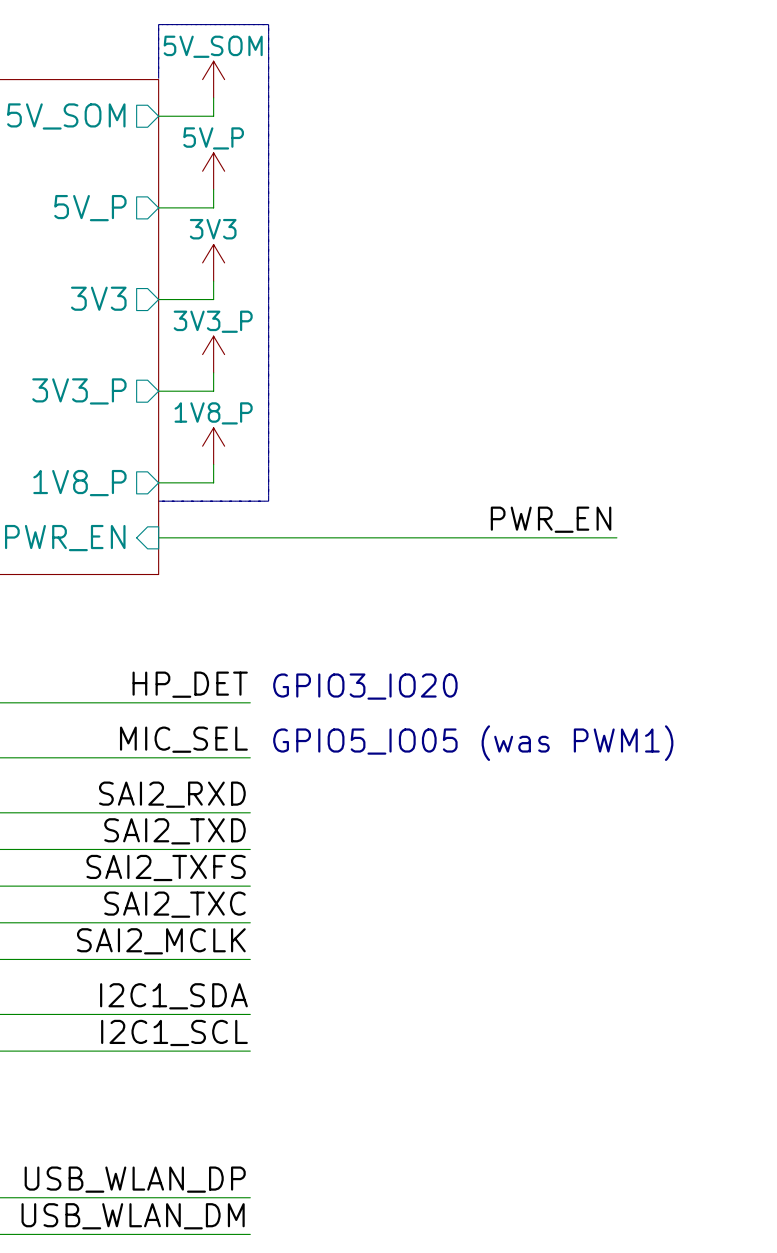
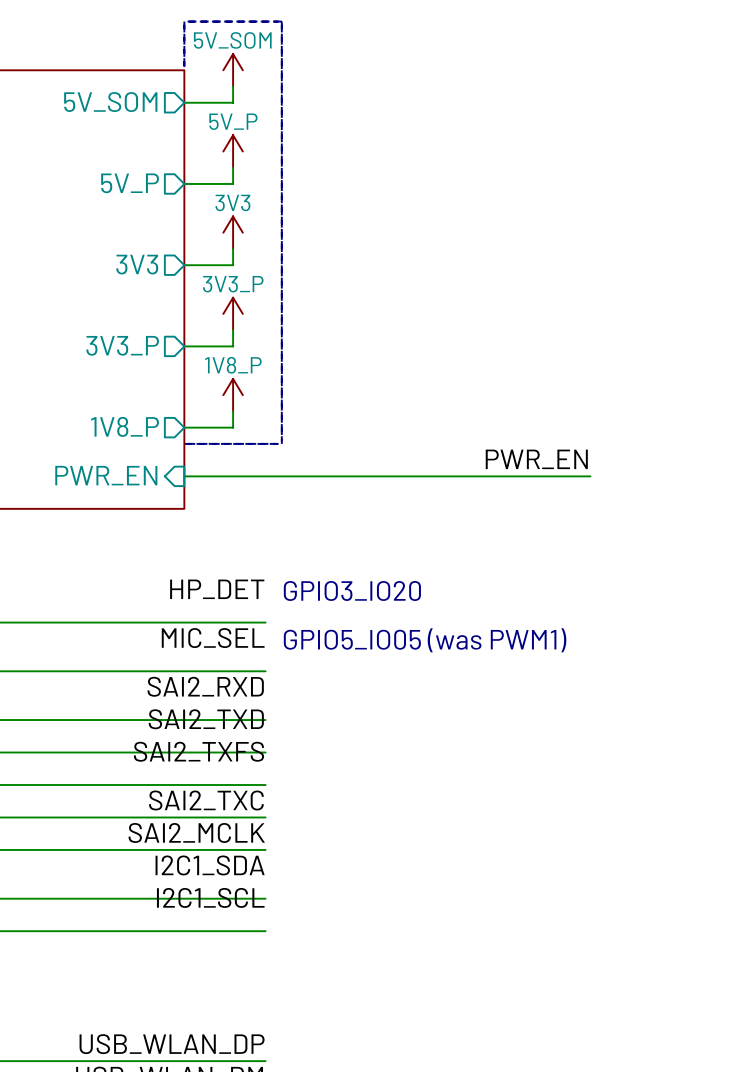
label position: HP_DET (190, 684) -> HP_DET (217, 589)
text position: GPIO3_IO20 (365, 686) -> GPIO3_IO20 (352, 591)
label position: MIC_SEL (183, 739) -> MIC_SEL (213, 638)
text position: GPIO5_IO05 (was PWM1) (473, 743) -> GPIO5_IO05 (was PWM1) (425, 640)
label position: SAI2_RXD (172, 794) -> SAI2_RXD (205, 686)
label position: SAI2_TXD (174, 831) -> SAI2_TXD (206, 719)
label position: SAI2_TXFS (166, 867) -> SAI2_TXFS (198, 751)
label position: I2C1_SDA (173, 996) -> I2C1_SDA (210, 865)
label position: I2C1_SCL (174, 1032) -> I2C1_SCL (210, 897)

